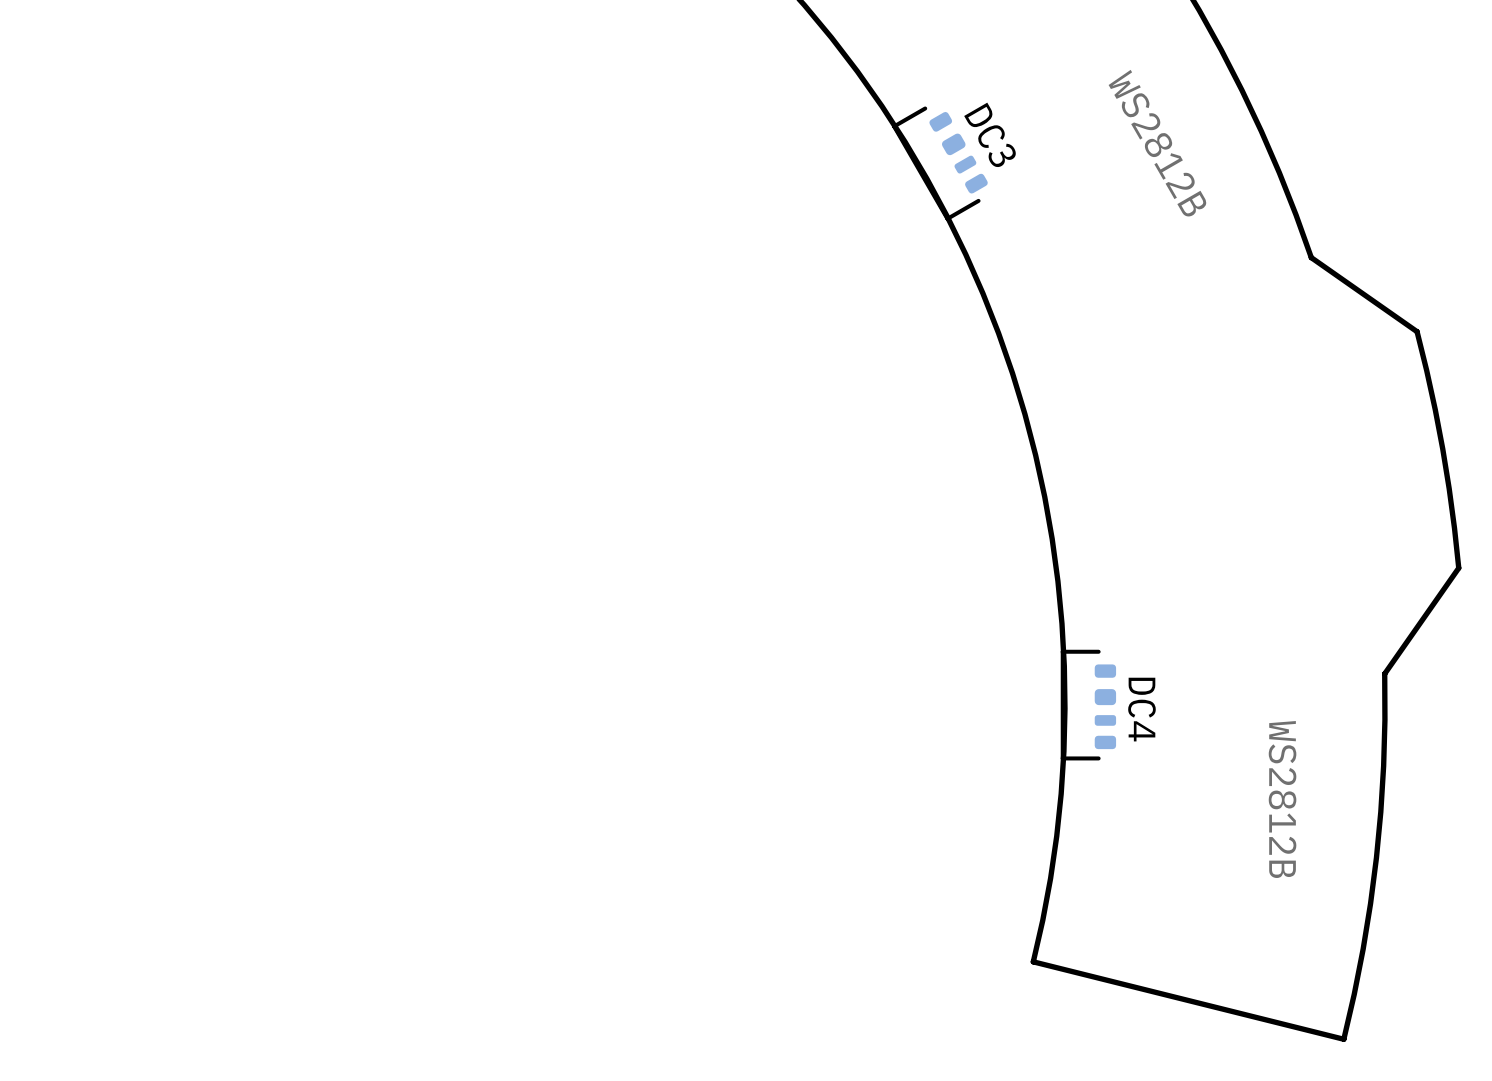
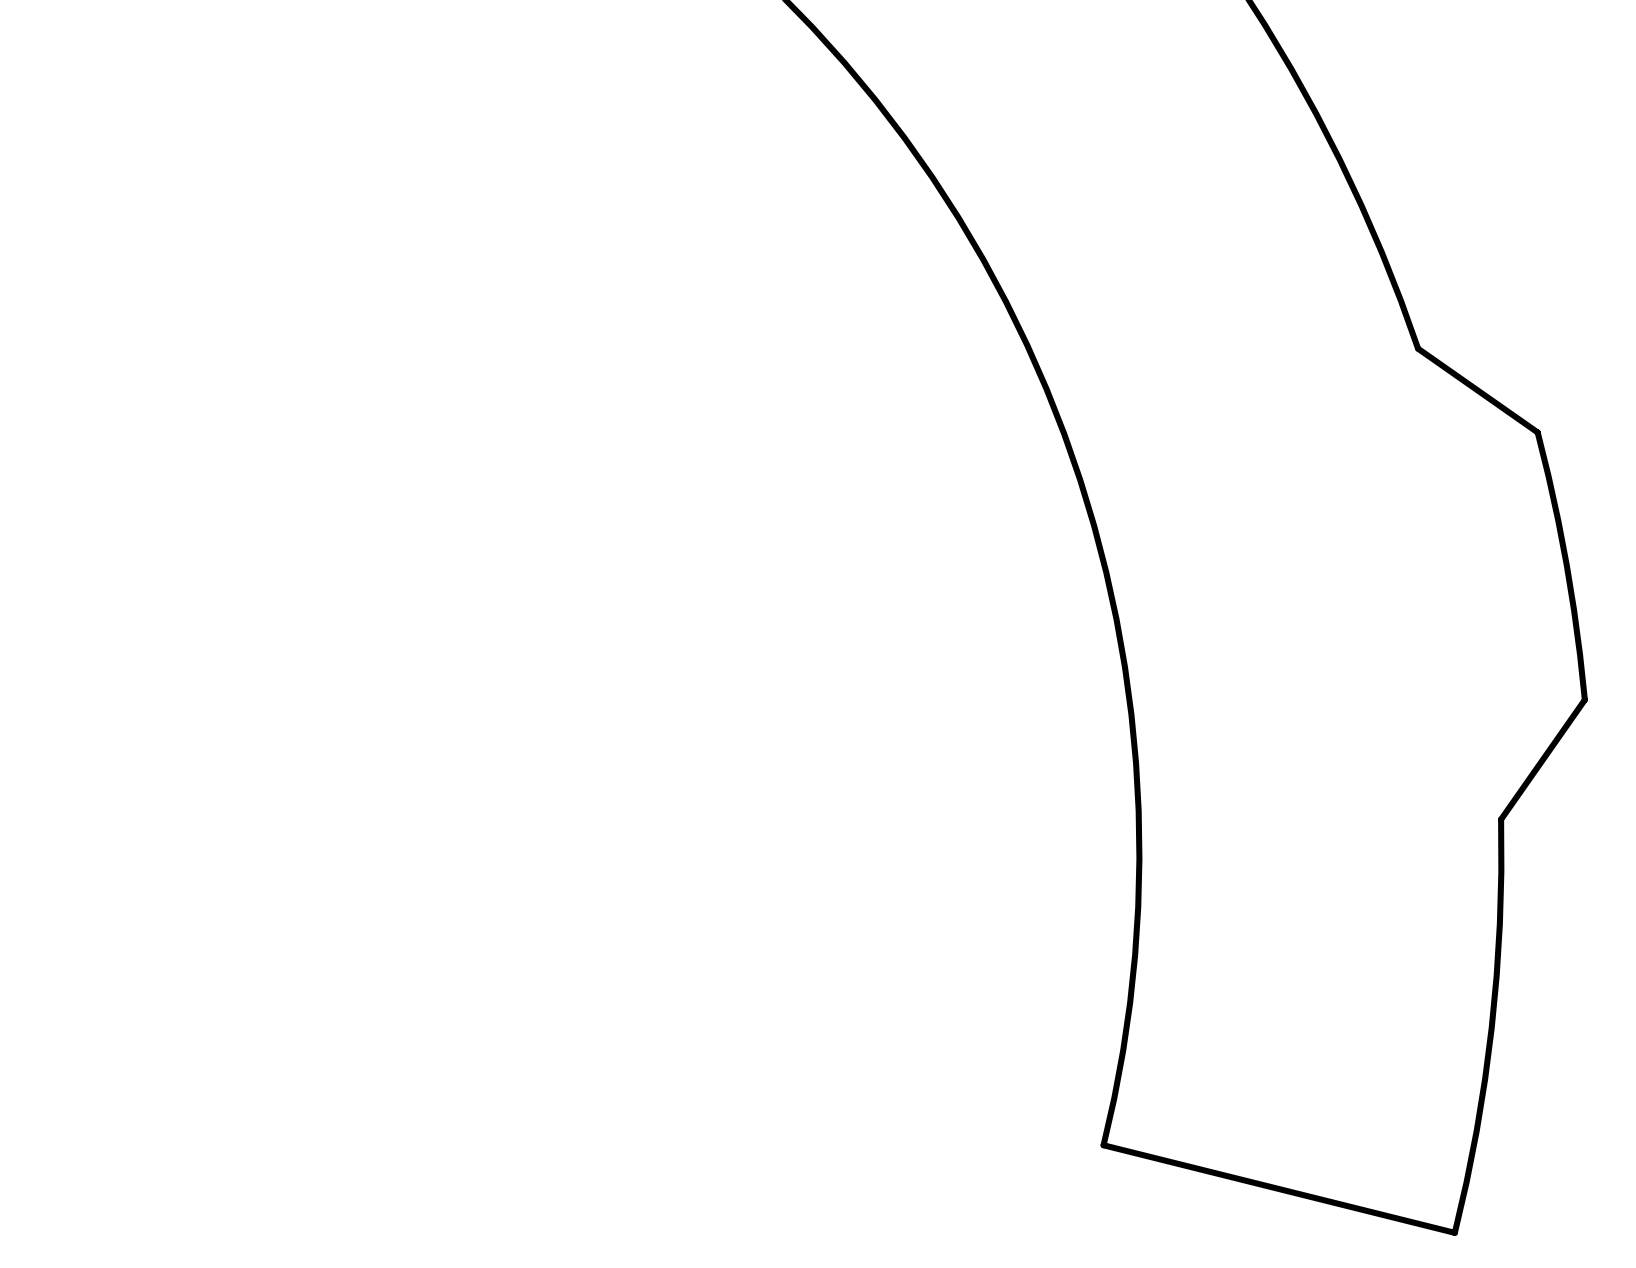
DC3: WS2812B (939, 163) -> none
DC4: WS2812B (1088, 705) -> none

